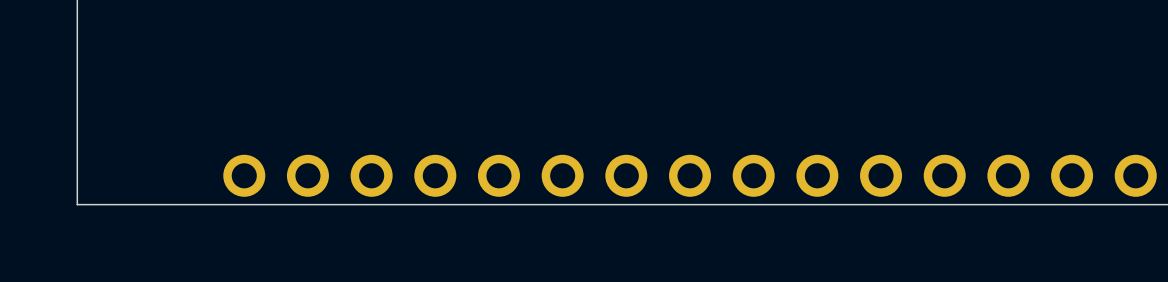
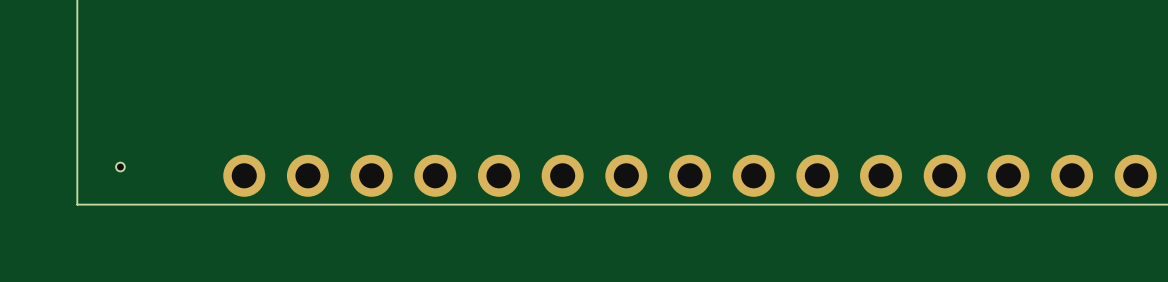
hole: none -> (120, 167)

